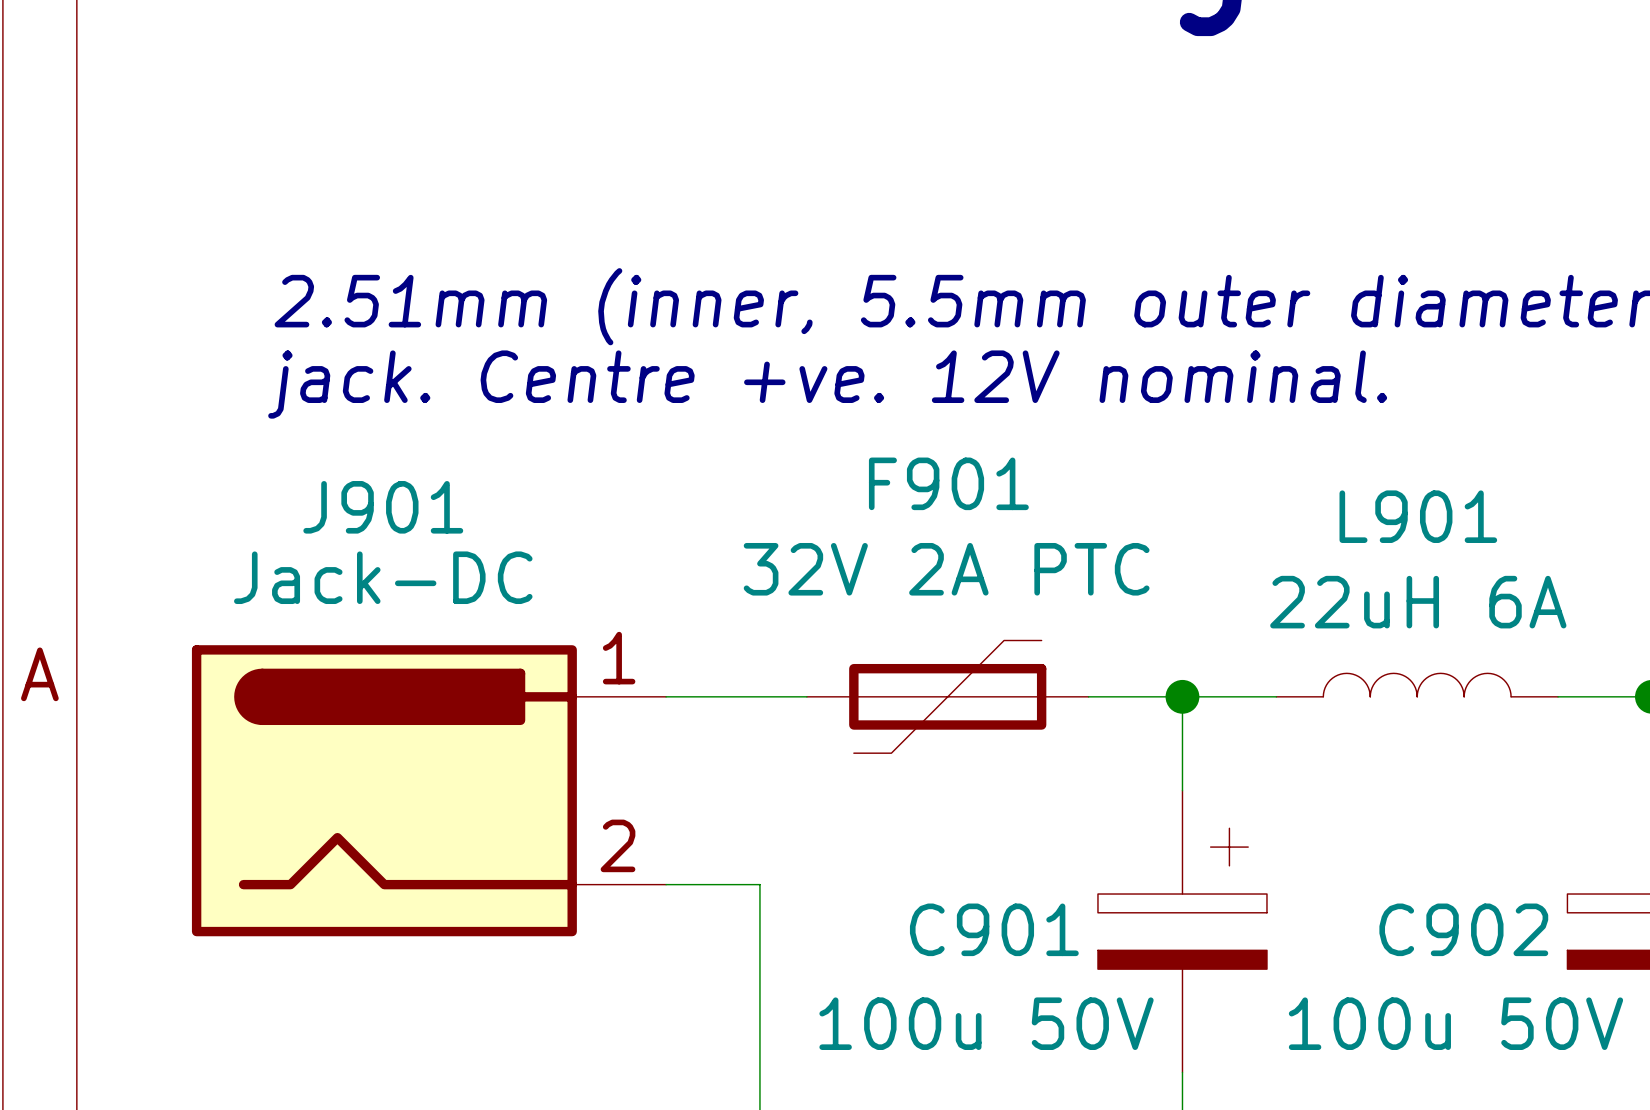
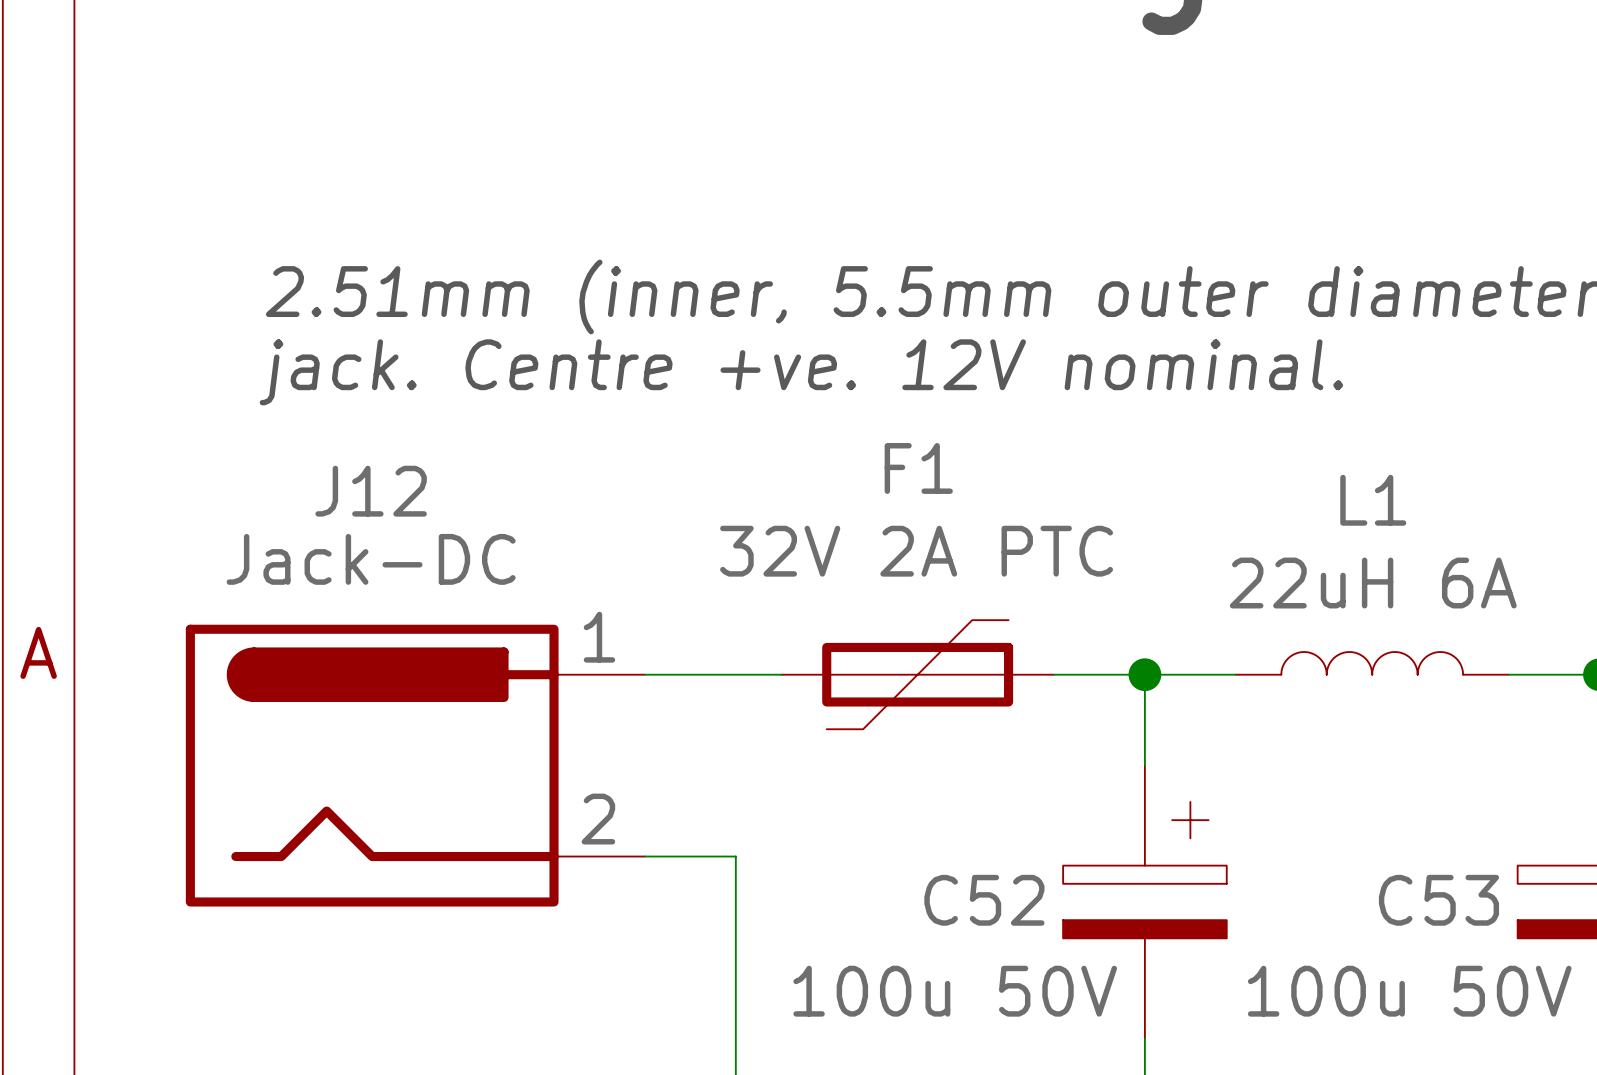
F901 name: F901 (948, 483) -> F1 (918, 468)
J901 name: J901 (383, 507) -> J12 (371, 491)
L901 name: L901 (1418, 516) -> L1 (1373, 500)
C901 name: C901 (994, 929) -> C52 (984, 900)
C902 name: C902 (1463, 929) -> C53 (1438, 900)

